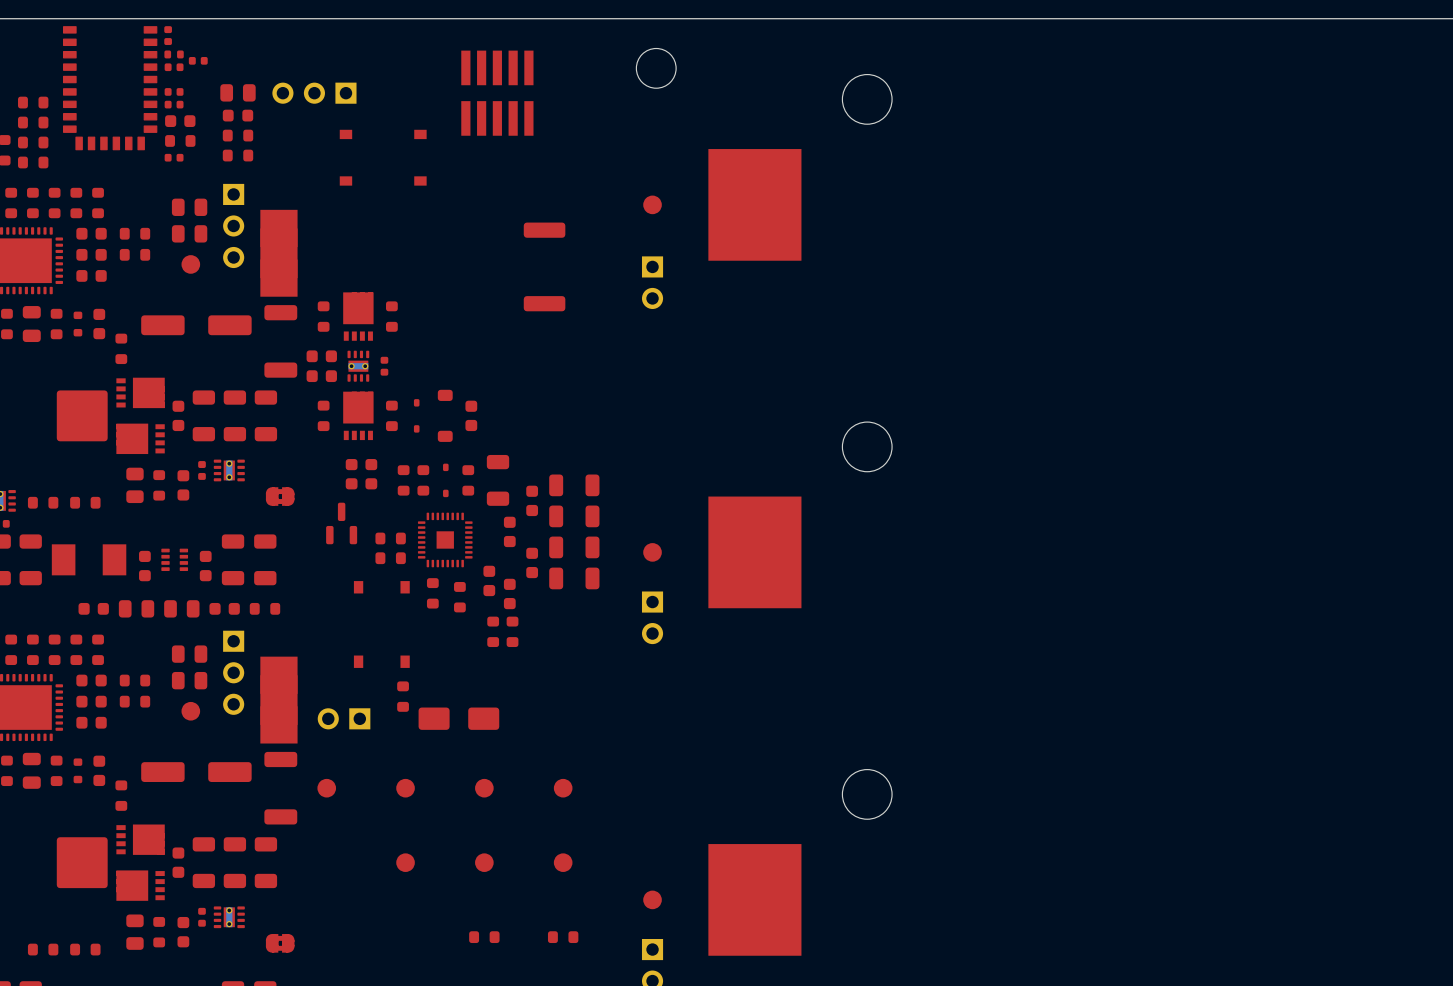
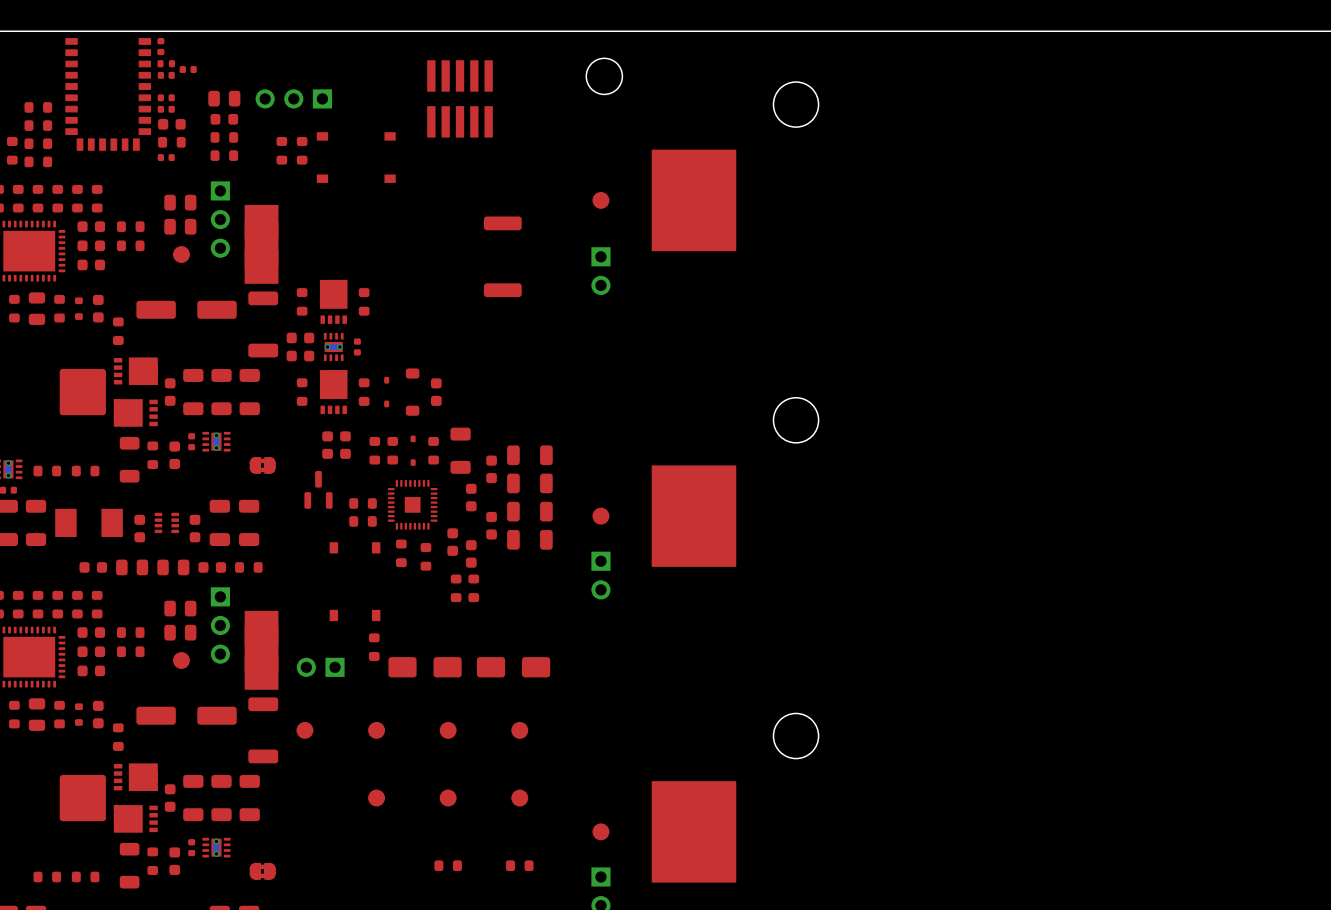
part: none -> (281, 150)
part: none -> (302, 150)
part footprint: [126, 467, 144, 504] -> [119, 436, 140, 483]
part: none -> (513, 667)
part footprint: [126, 914, 144, 950] -> [119, 842, 140, 889]

